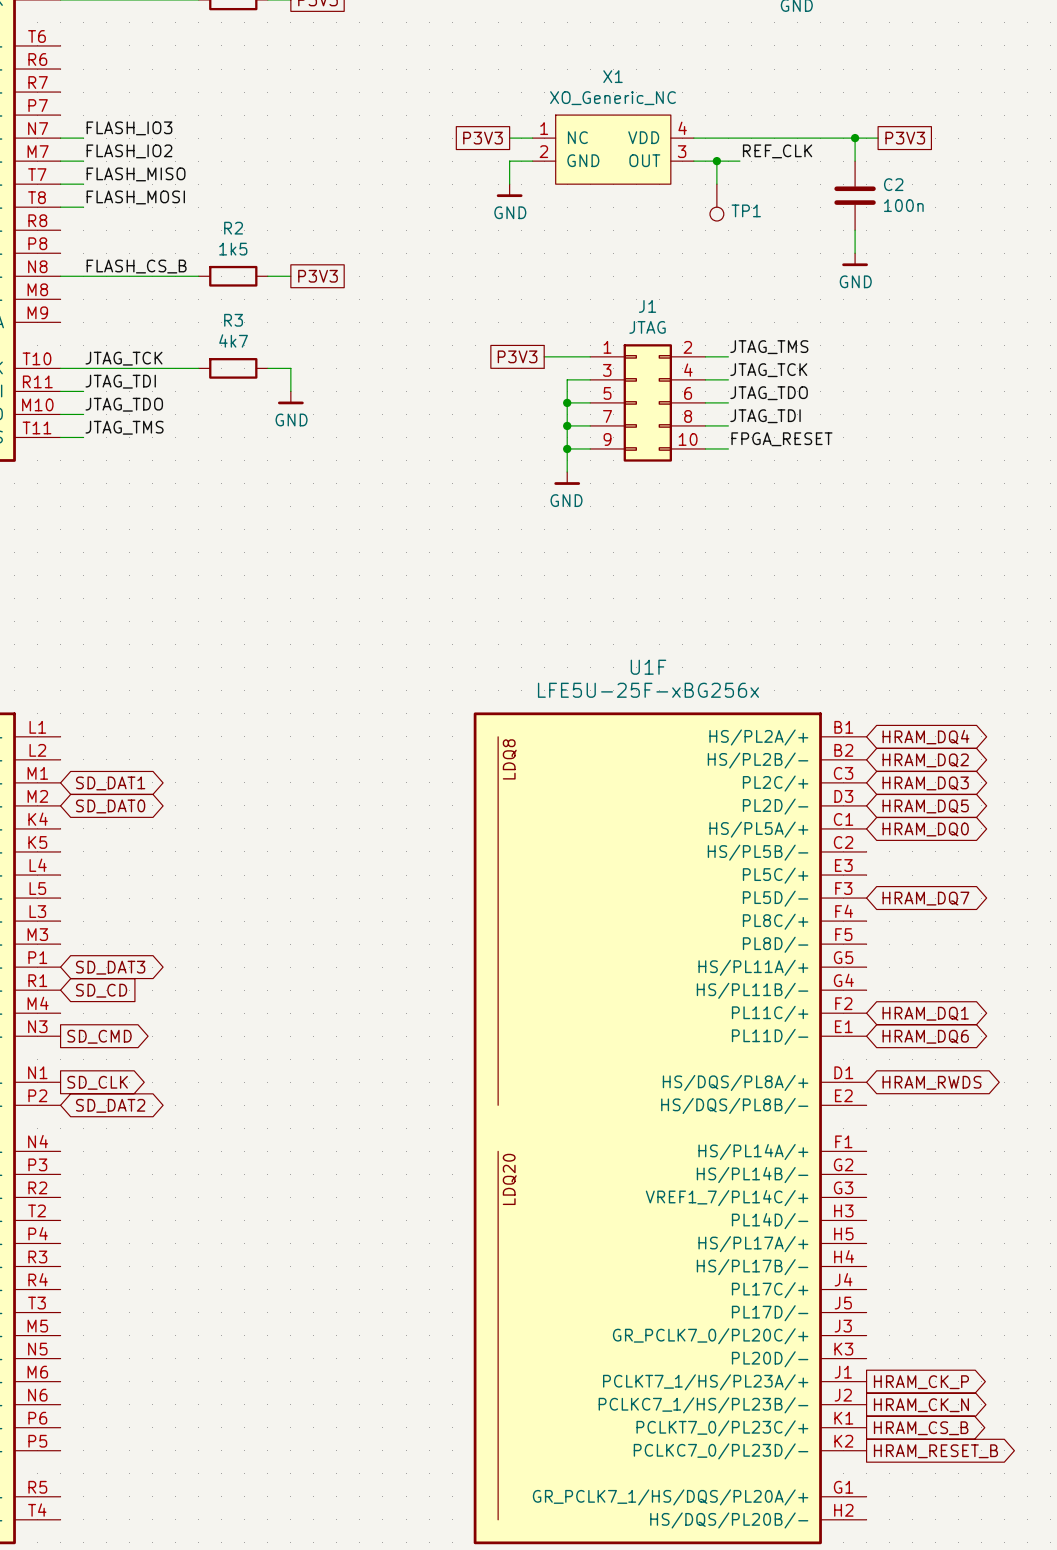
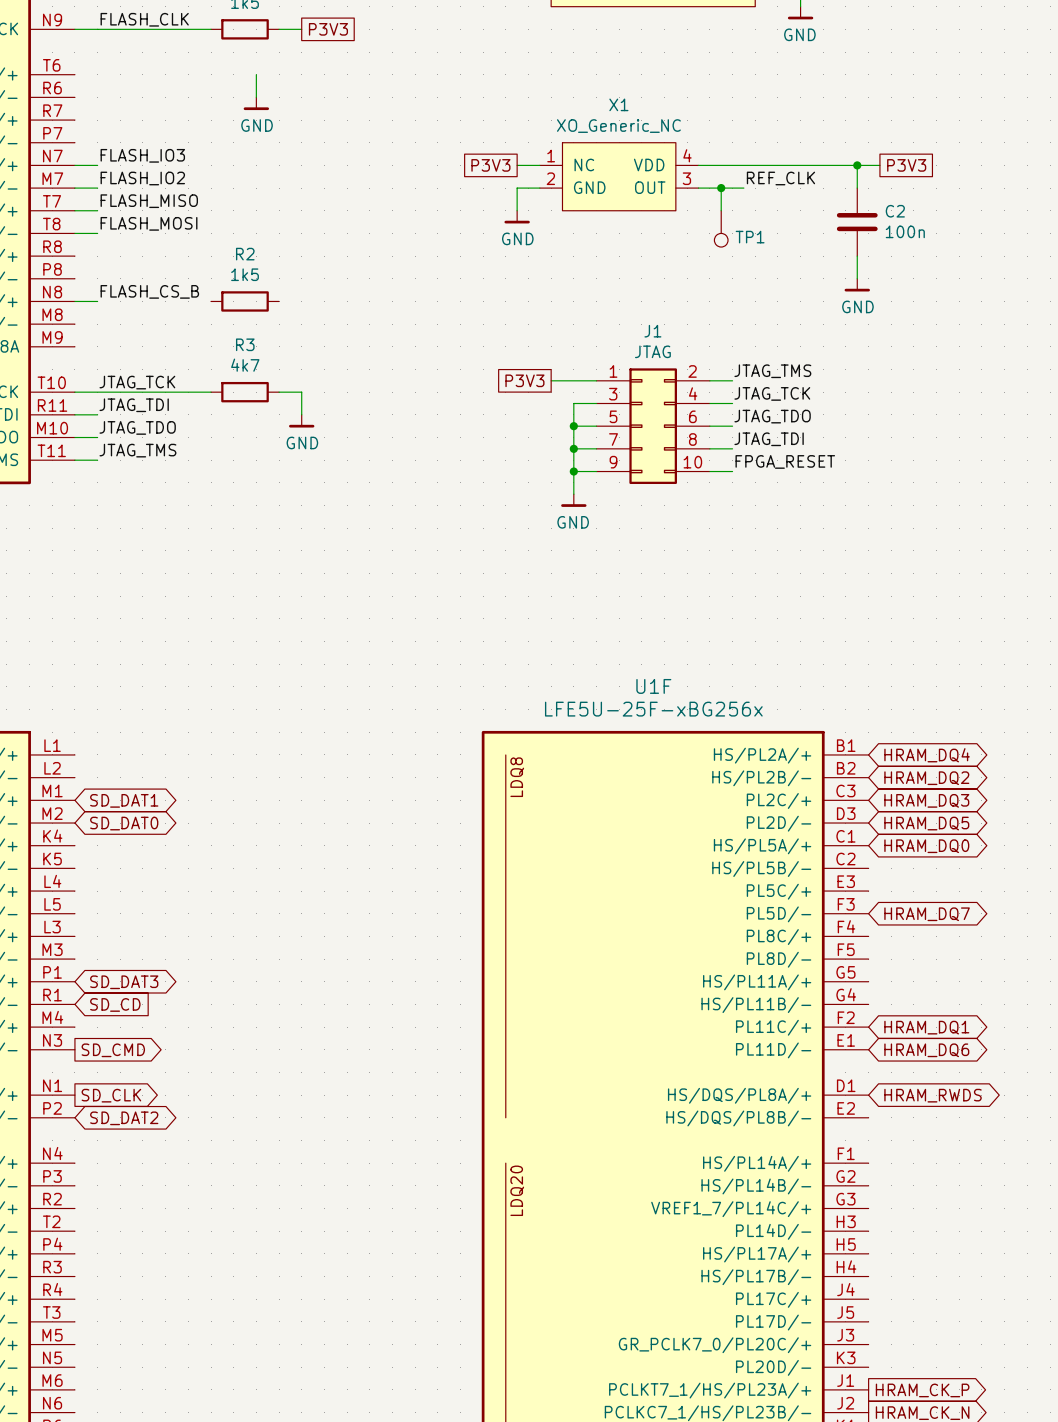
wire: none -> (256, 74) (256, 97)
power symbol: none -> GND (256, 103)
wire: (83, 276) (198, 276) -> none
wire: (267, 276) (290, 276) -> none
global label: P3V3 (318, 276) -> none

